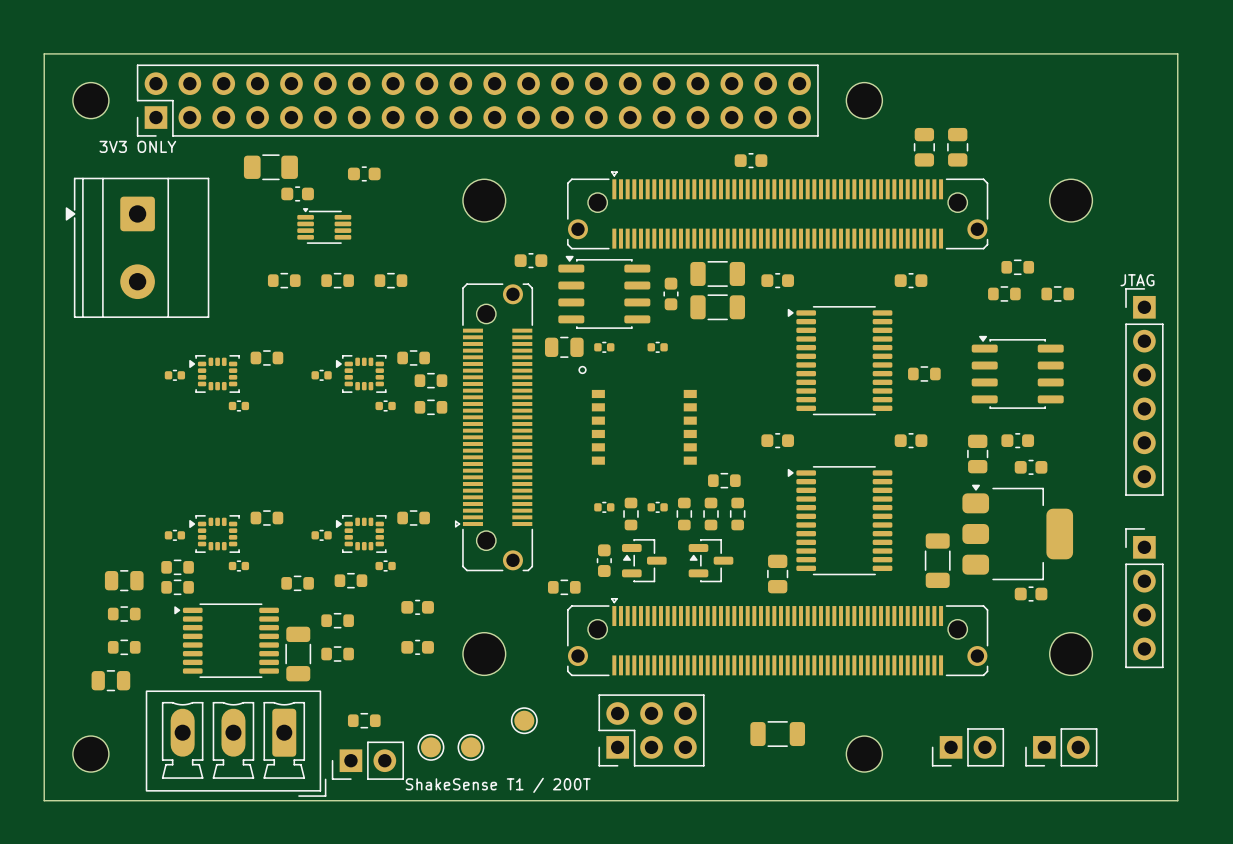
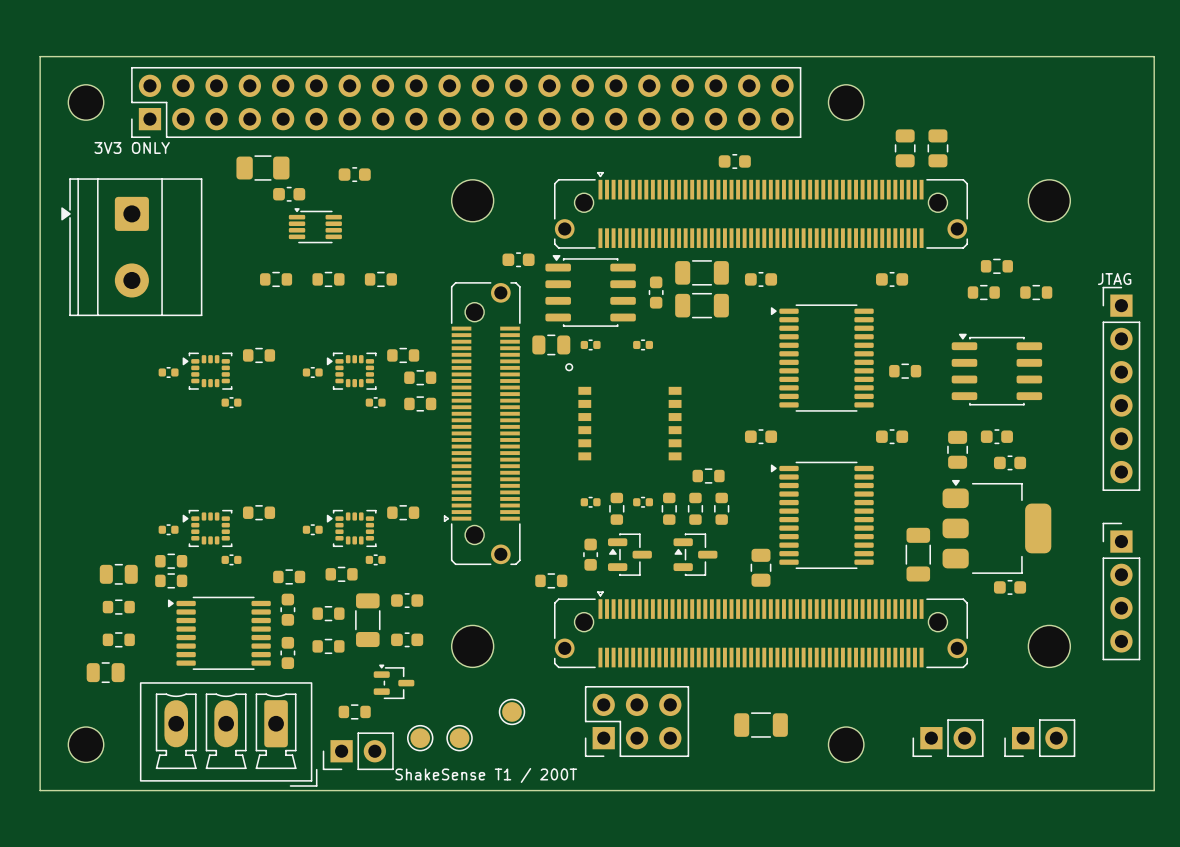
part: none -> (287, 609)
part footprint: [285, 626, 312, 682] -> [280, 636, 296, 670]
part: none -> (367, 620)
part: none -> (394, 681)

